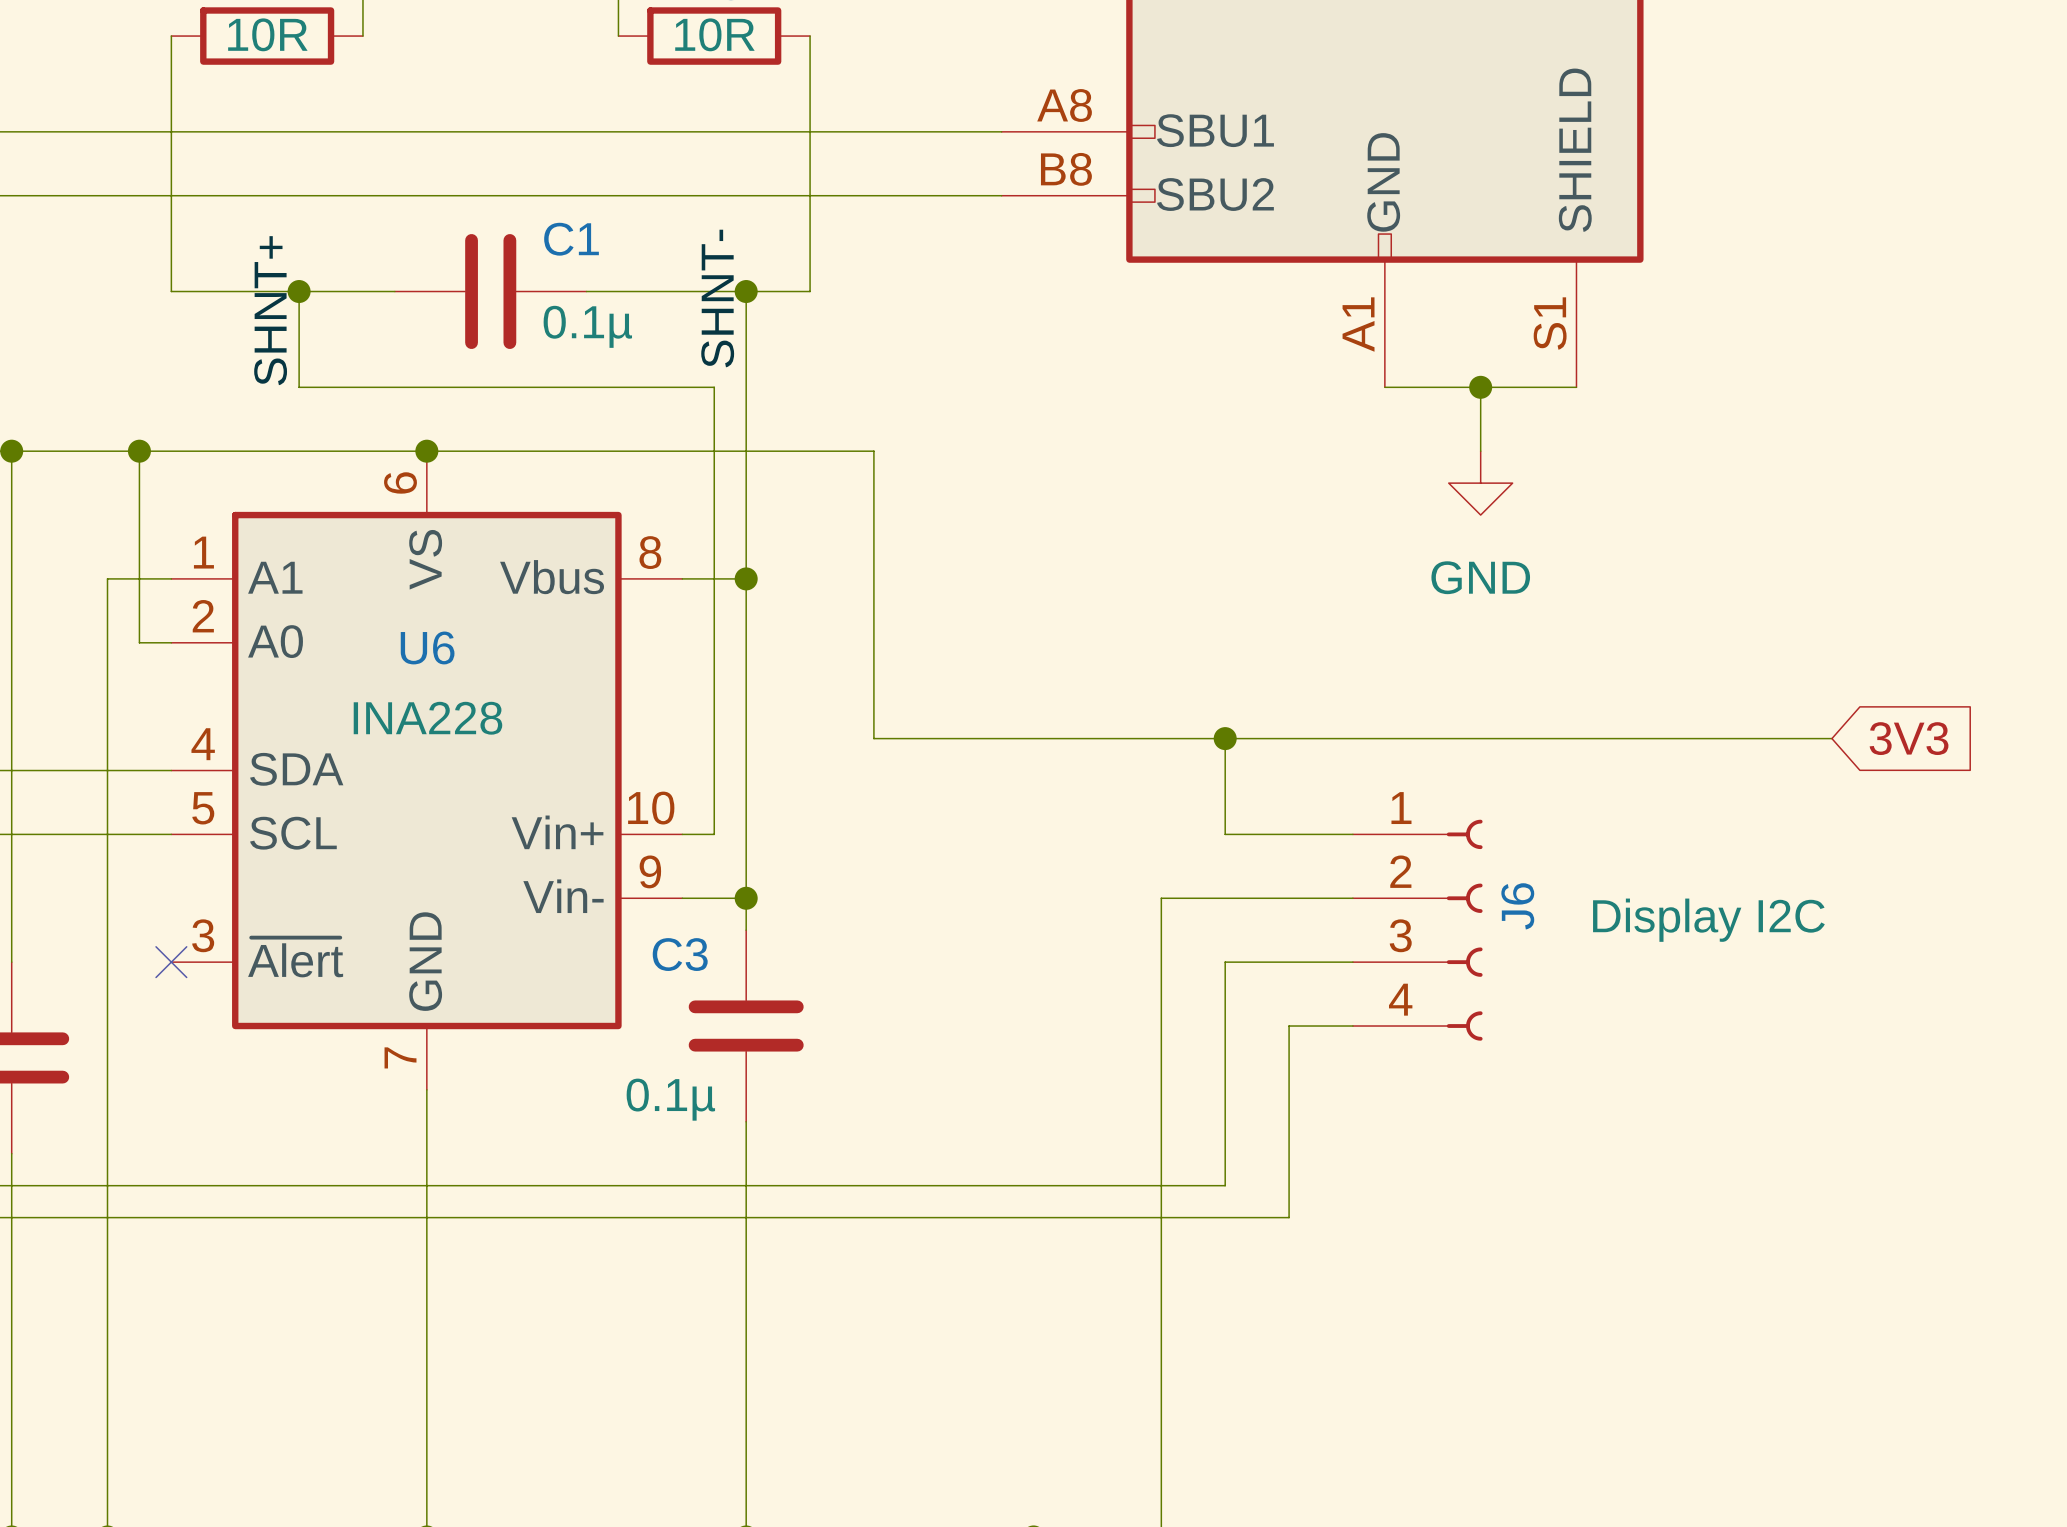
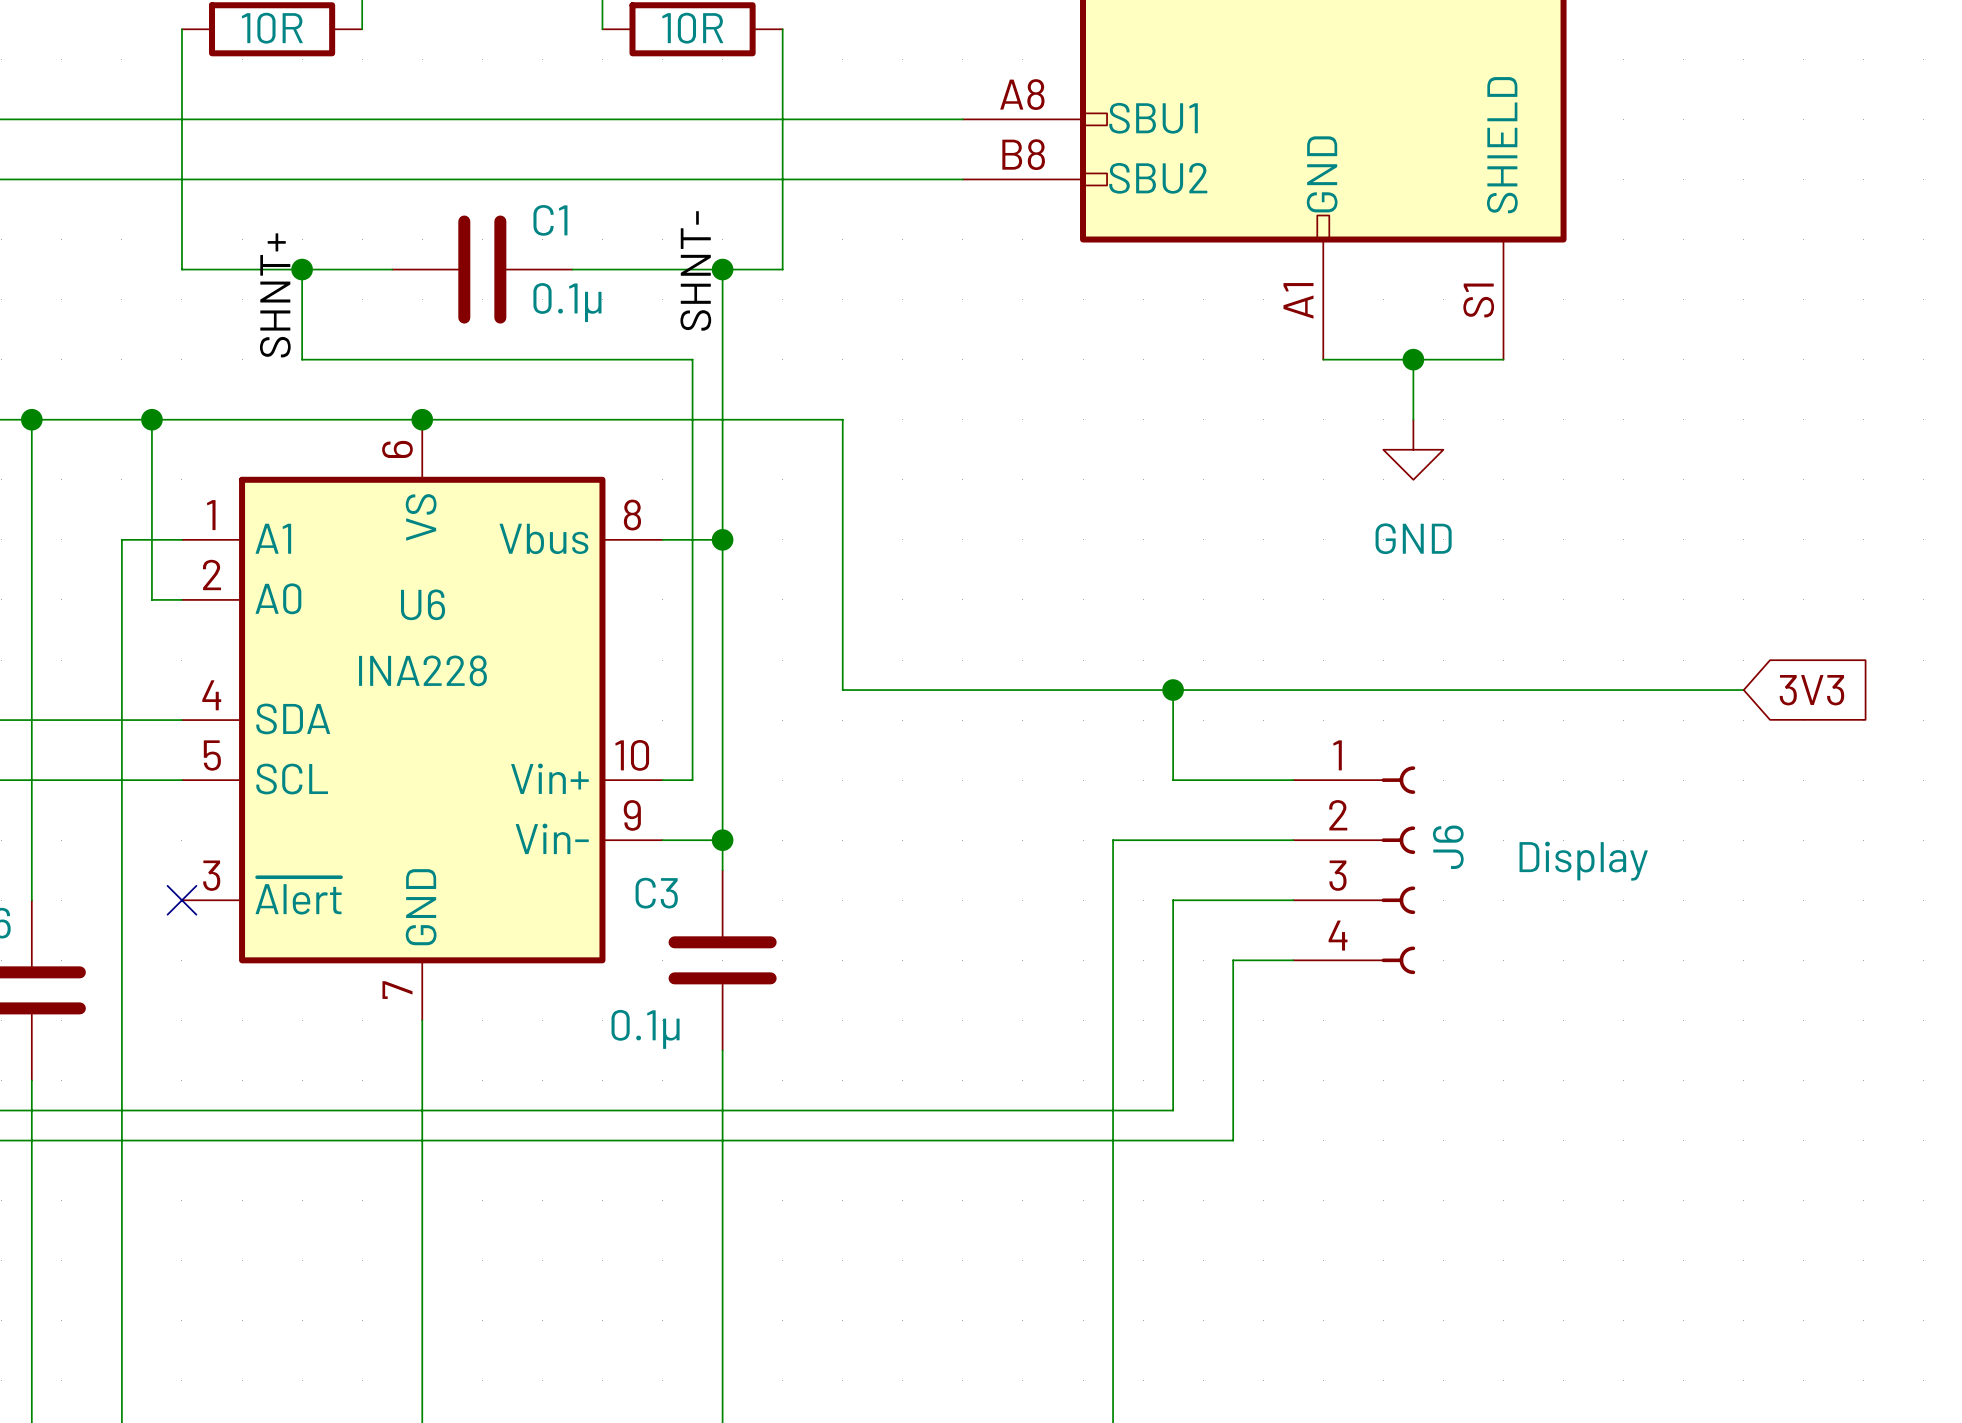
J6 value: Display I2C (1708, 920) -> Display (1583, 861)

